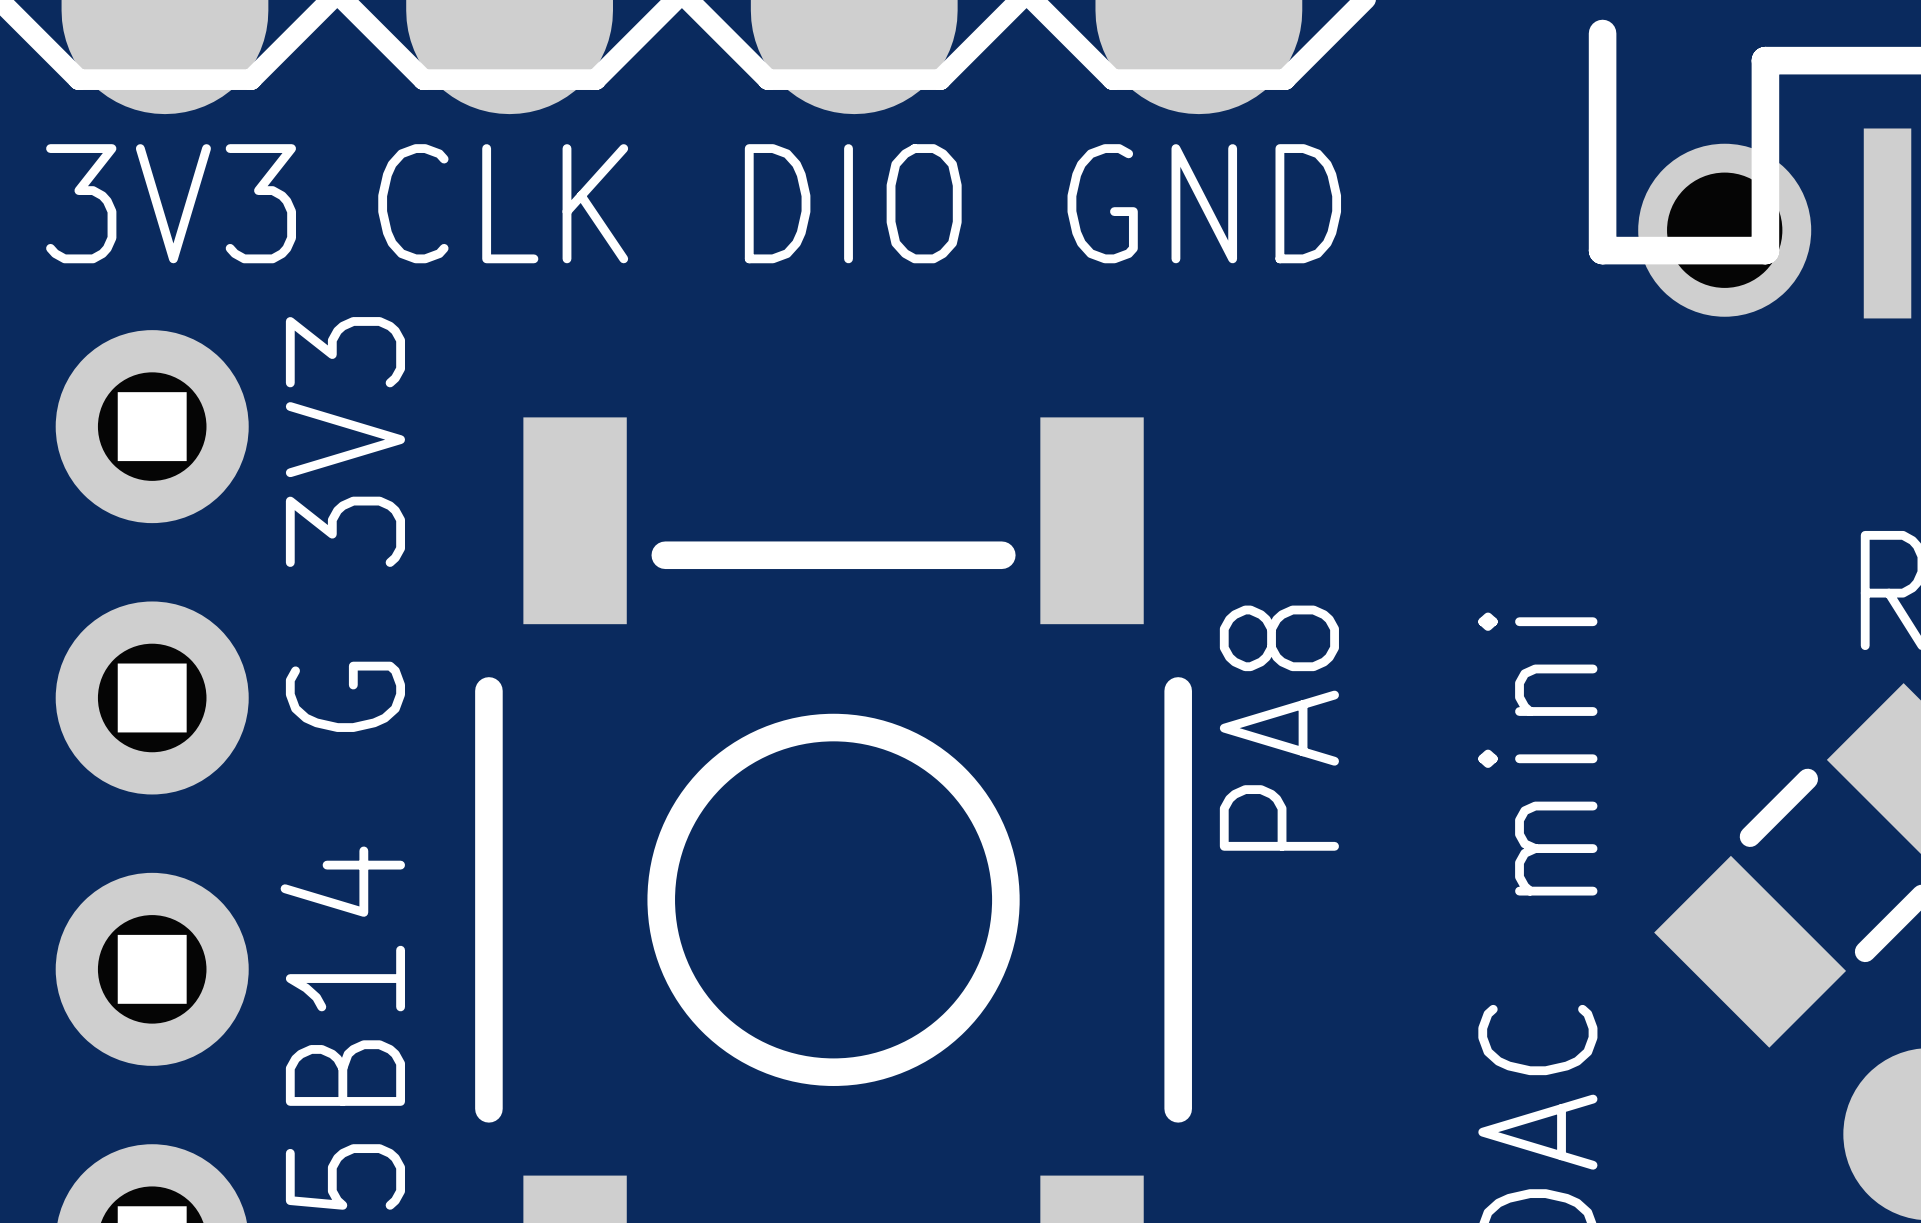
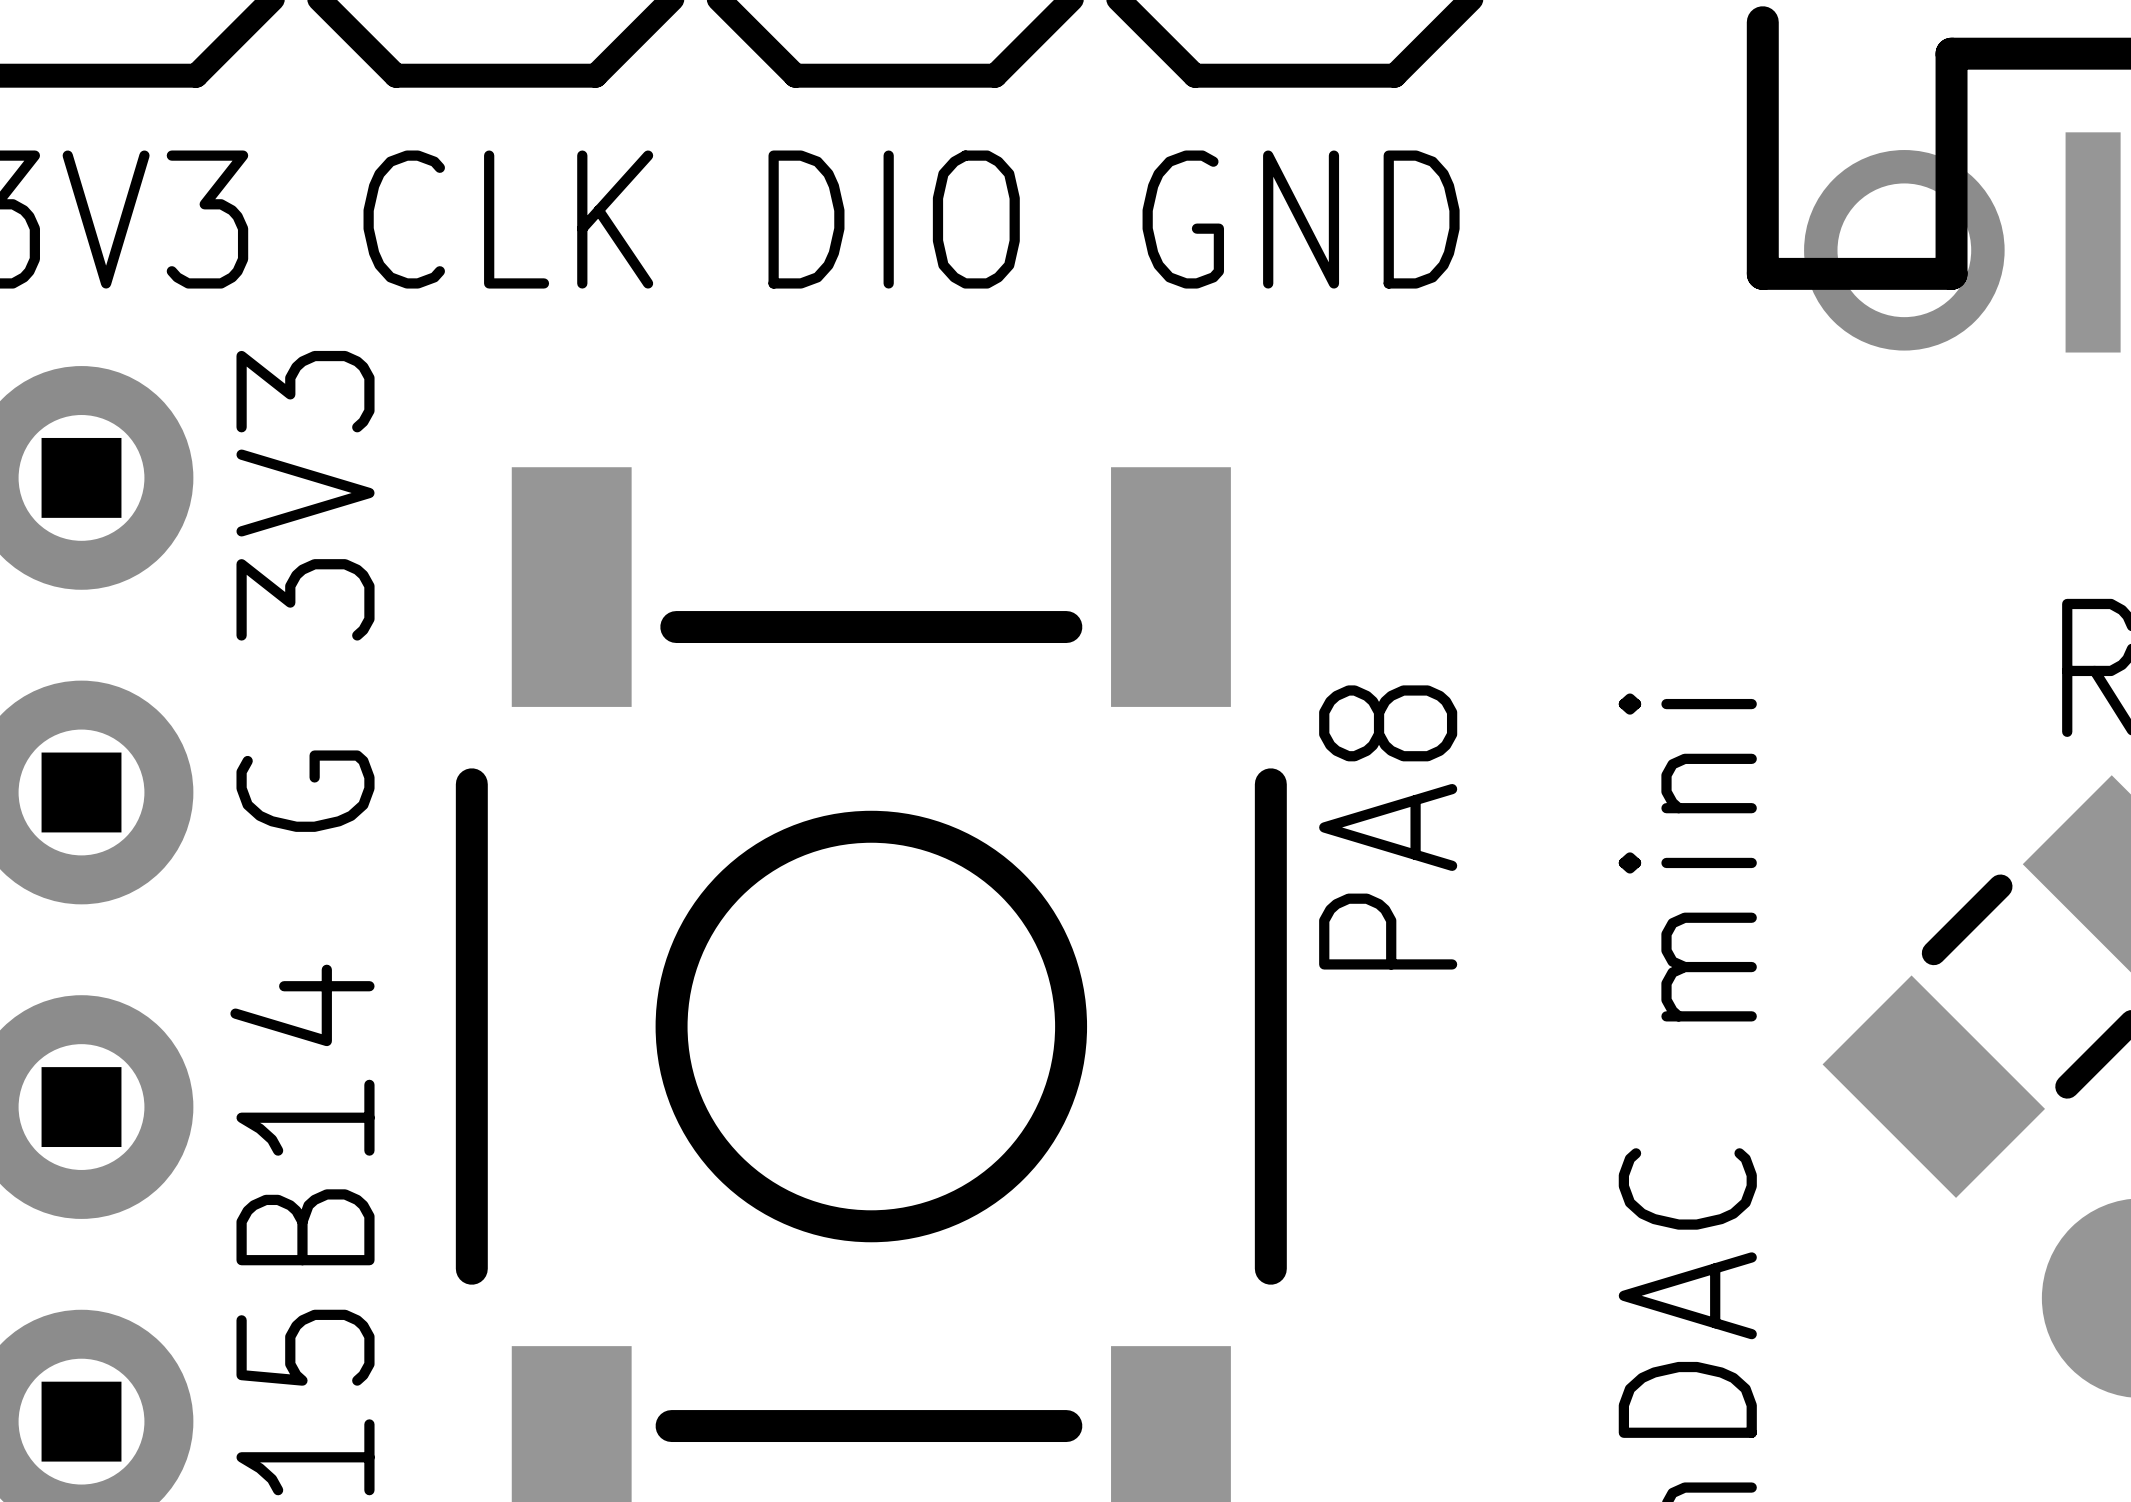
text position: CLK (503, 203) -> CLK (508, 219)

